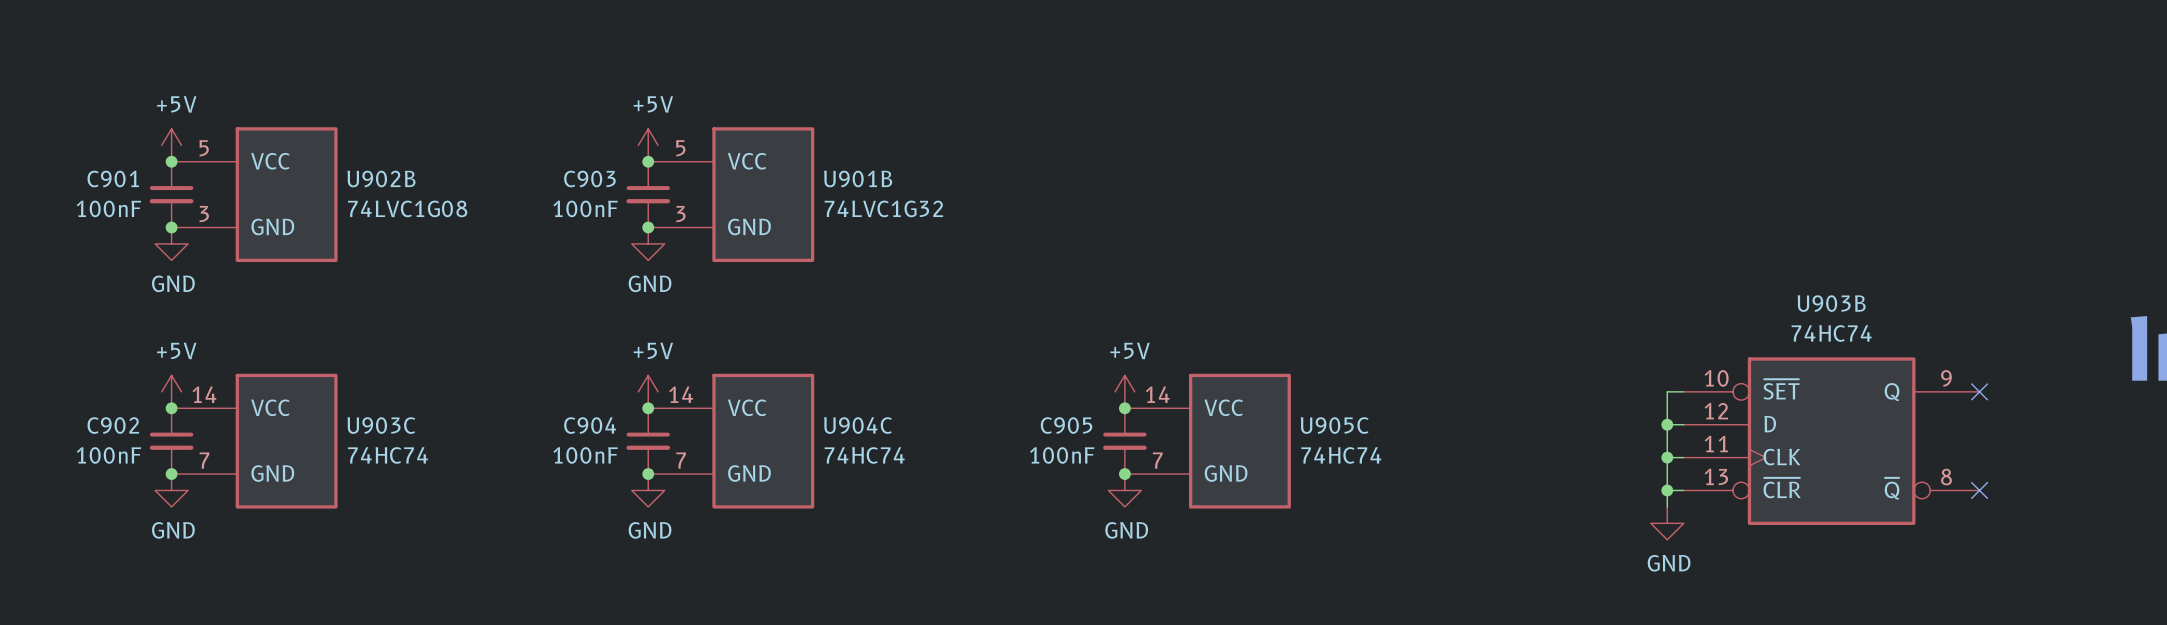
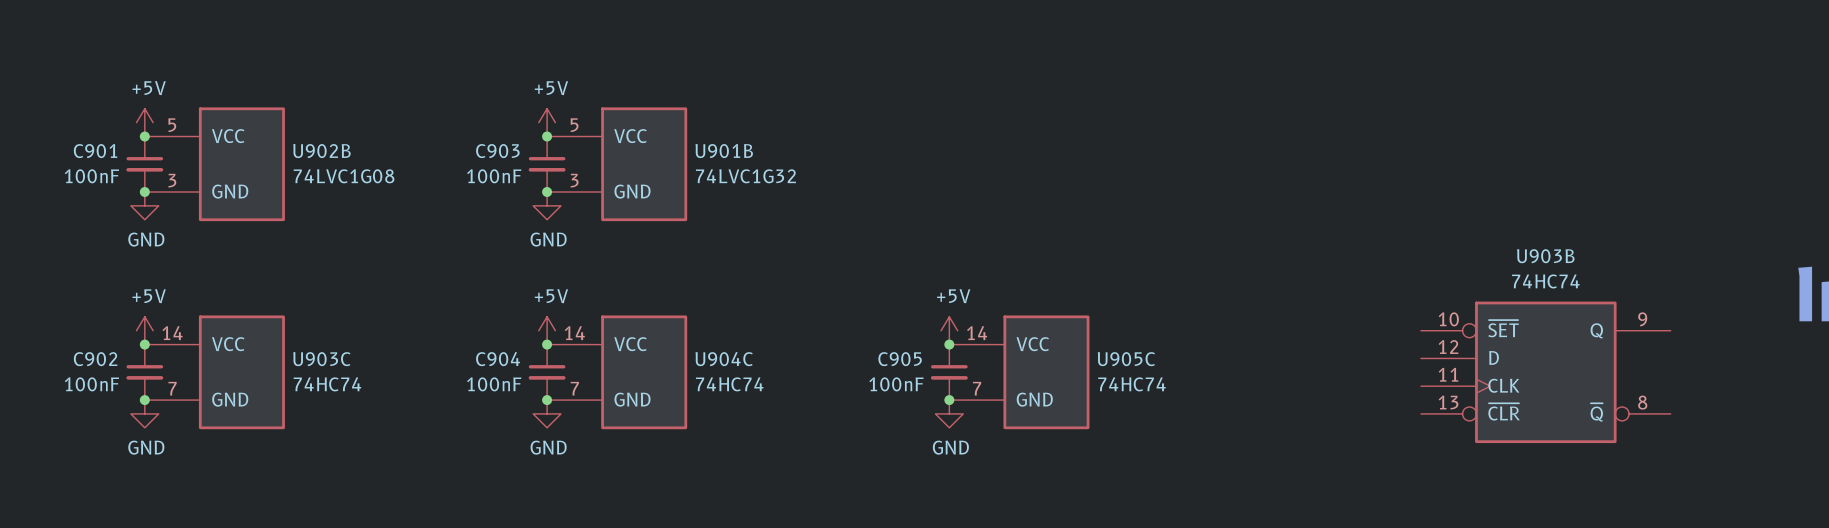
wire: (1683, 391) (1667, 391) (1667, 506) -> none
no-connect mark: (1979, 391) -> none
wire: (1667, 424) (1683, 424) -> none
junction: (1667, 424) -> none
wire: (1667, 457) (1683, 457) -> none
junction: (1667, 457) -> none
wire: (1667, 490) (1683, 490) -> none
junction: (1667, 490) -> none
no-connect mark: (1979, 490) -> none
power symbol: GND (1667, 523) -> none

